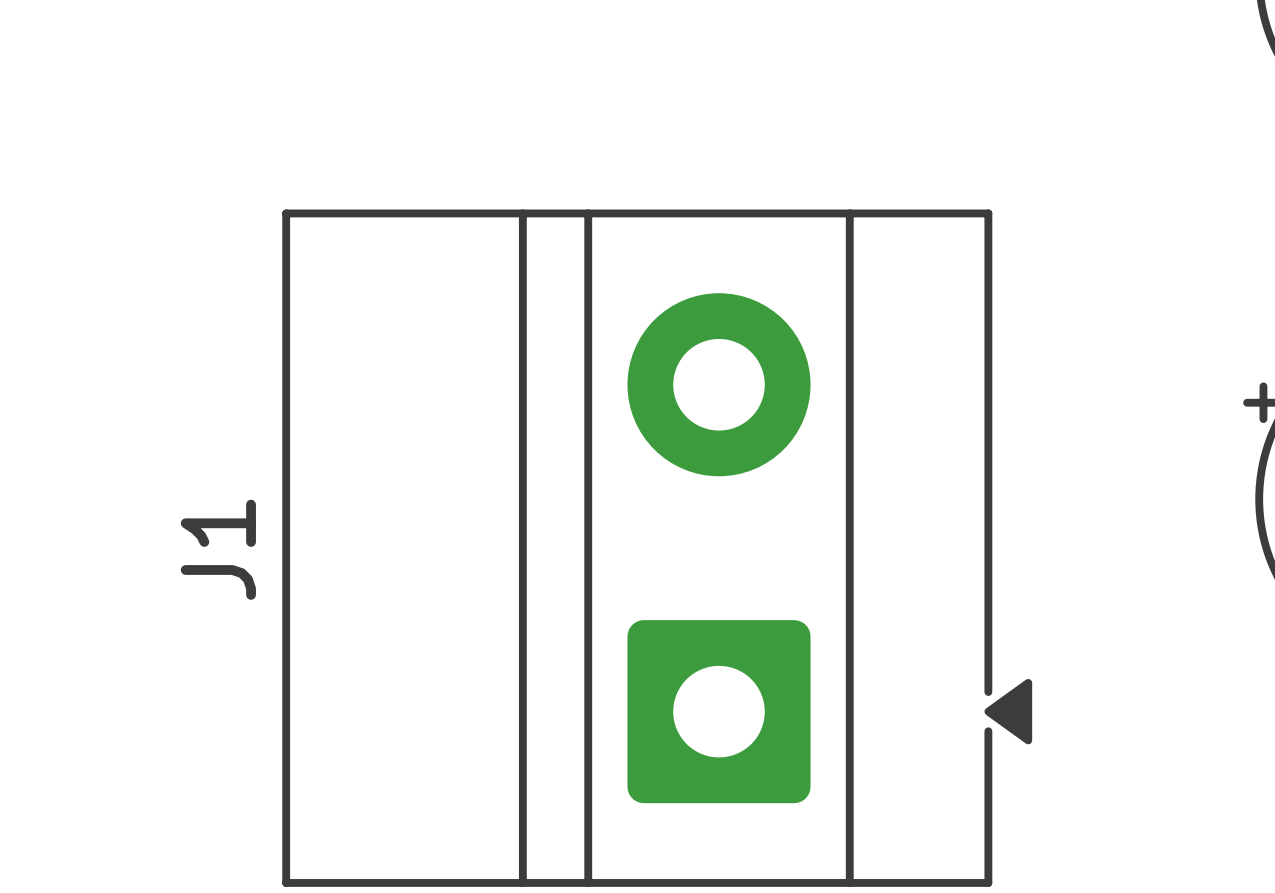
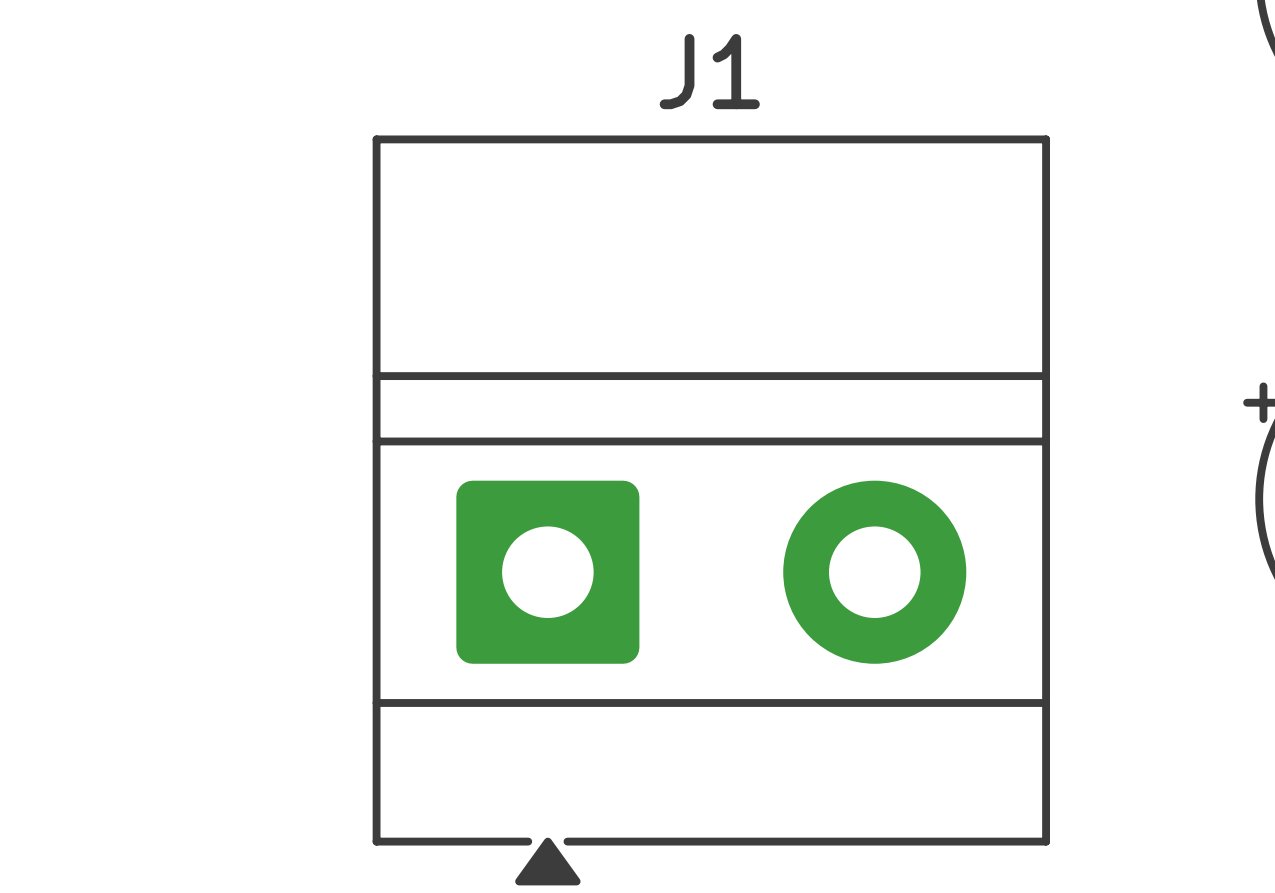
J1 rotation: 0° (657, 548) -> 90° clockwise (711, 510)

